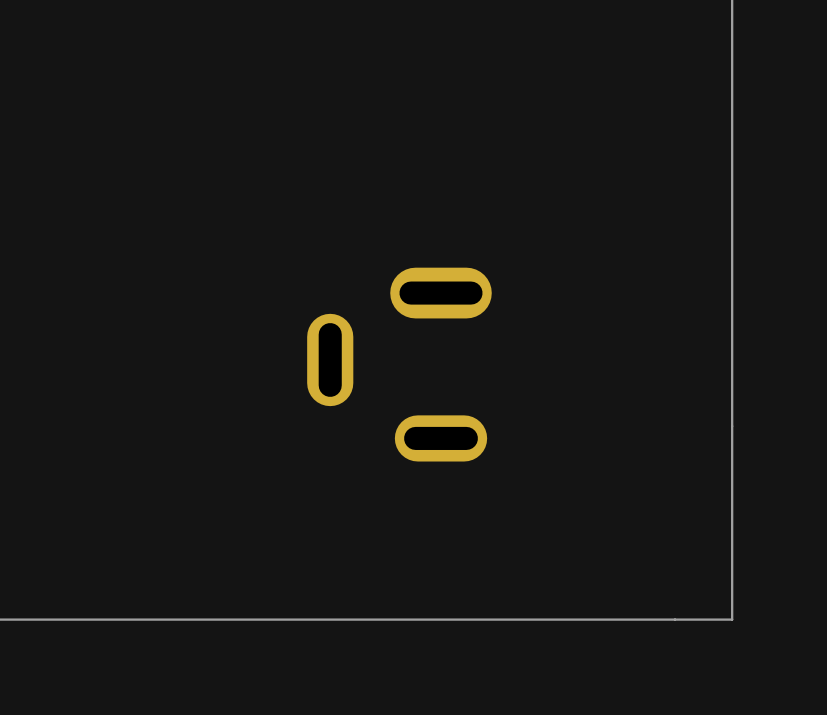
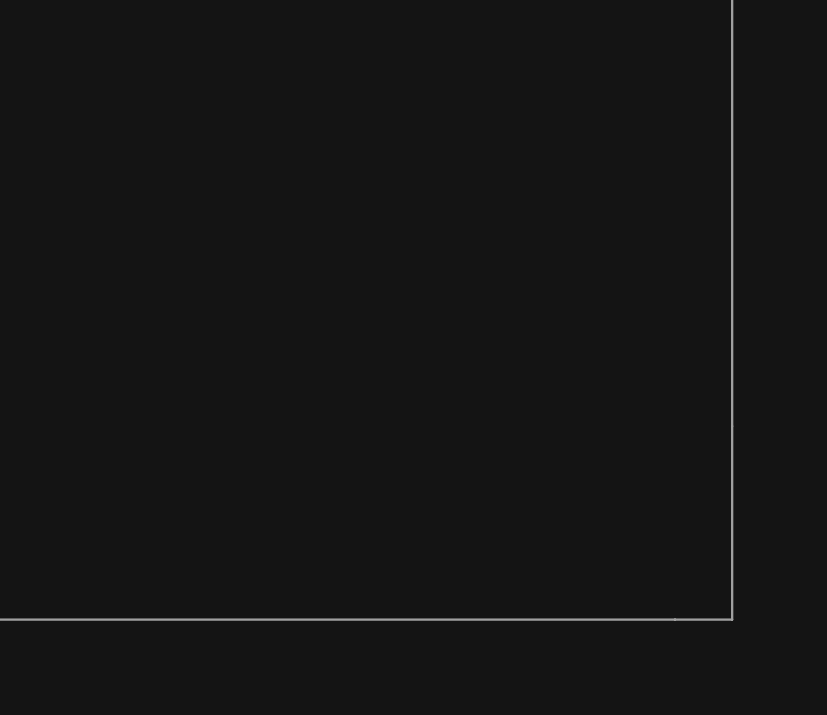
part: (399, 364) -> none

